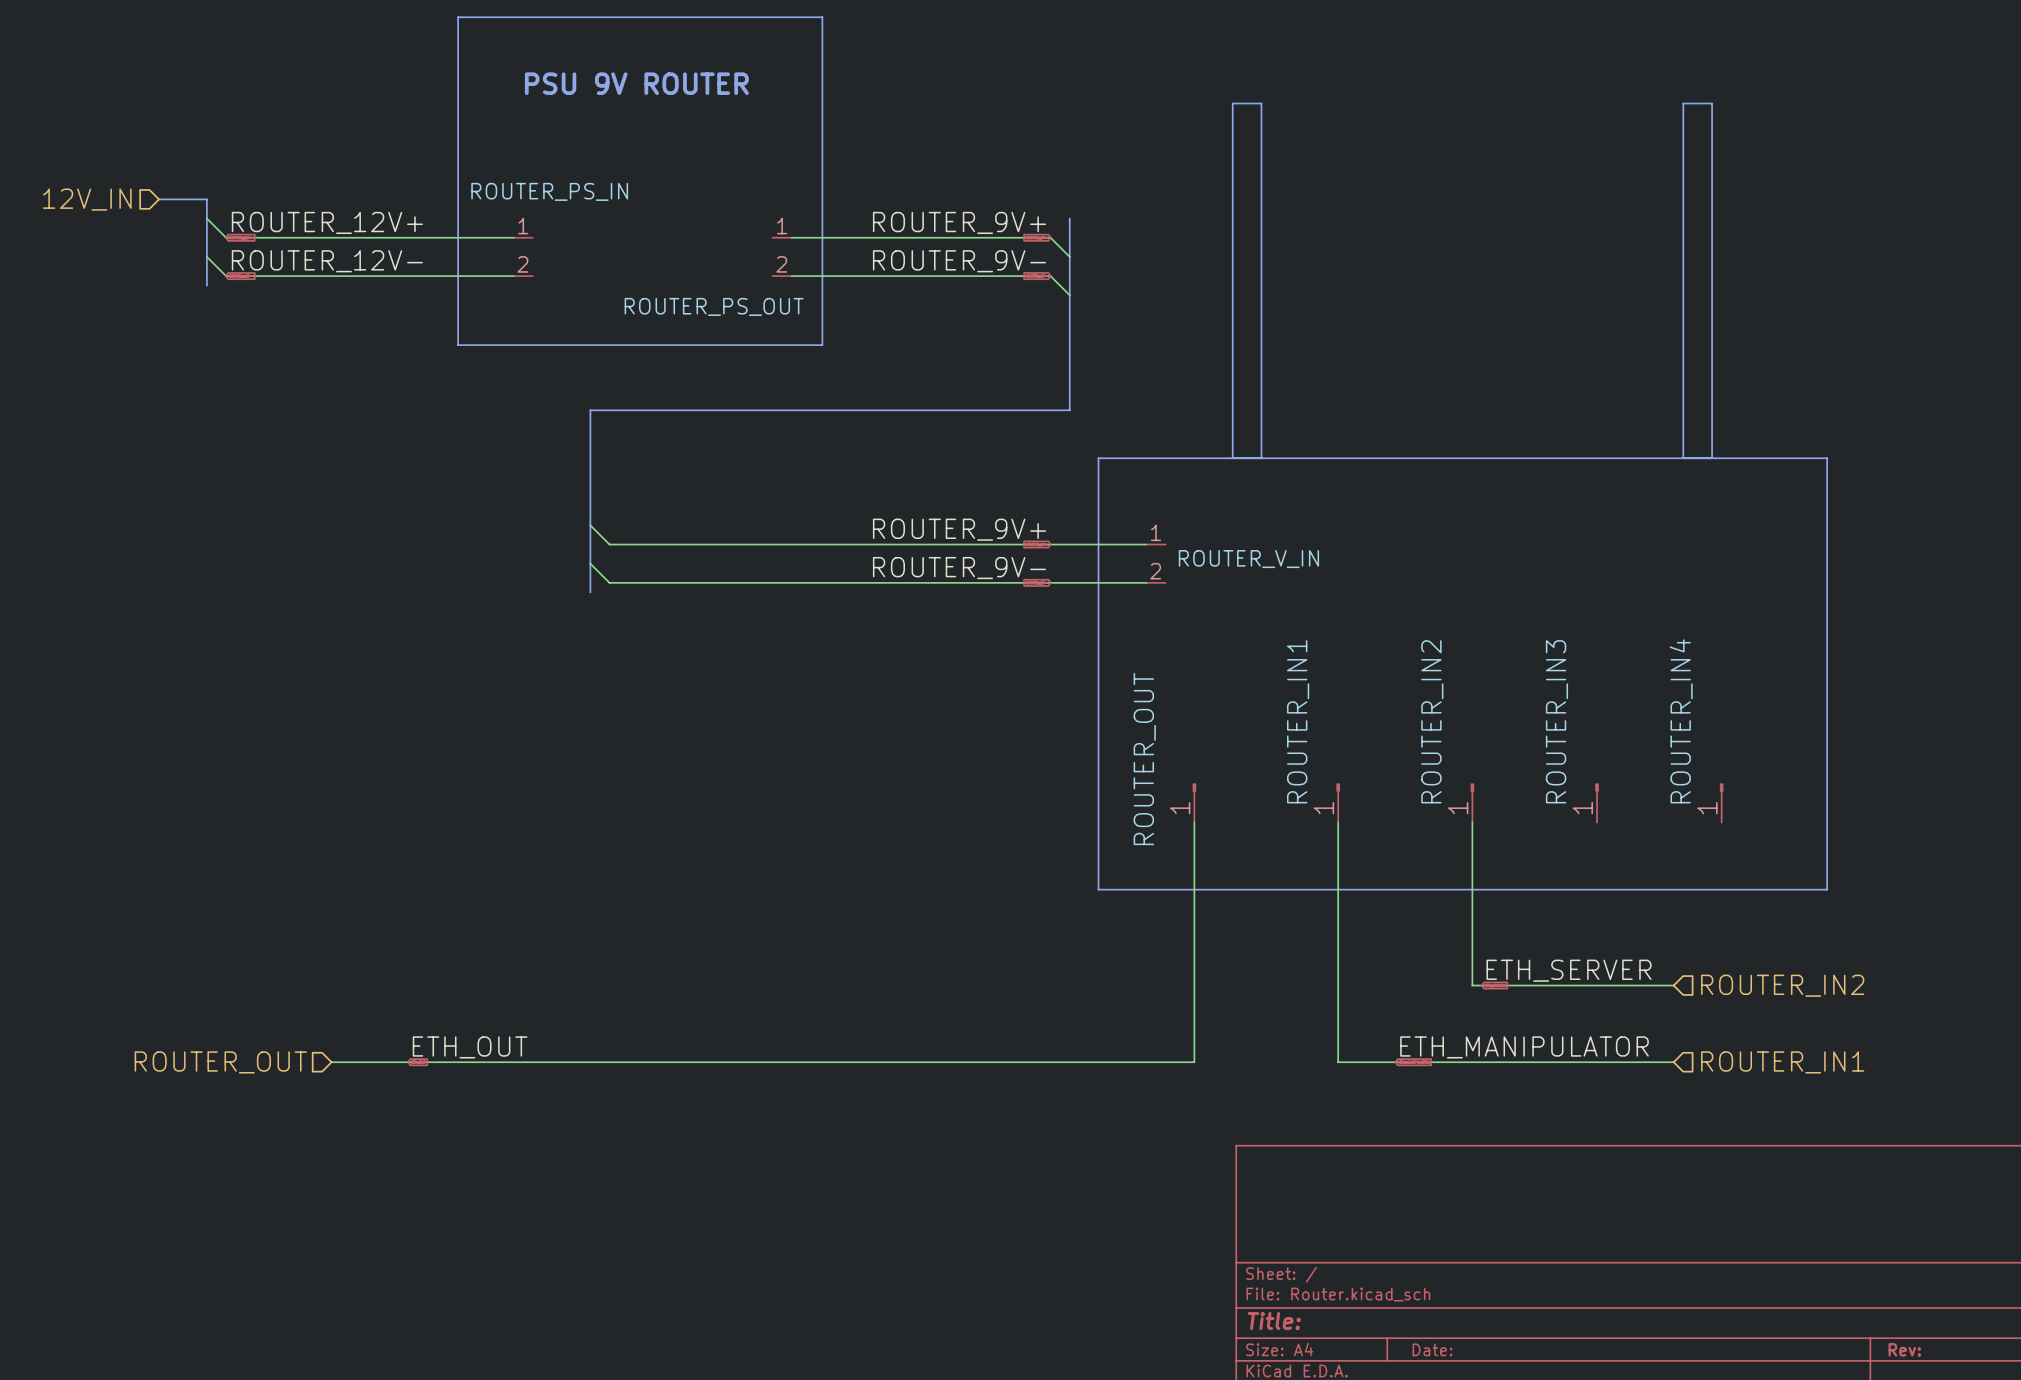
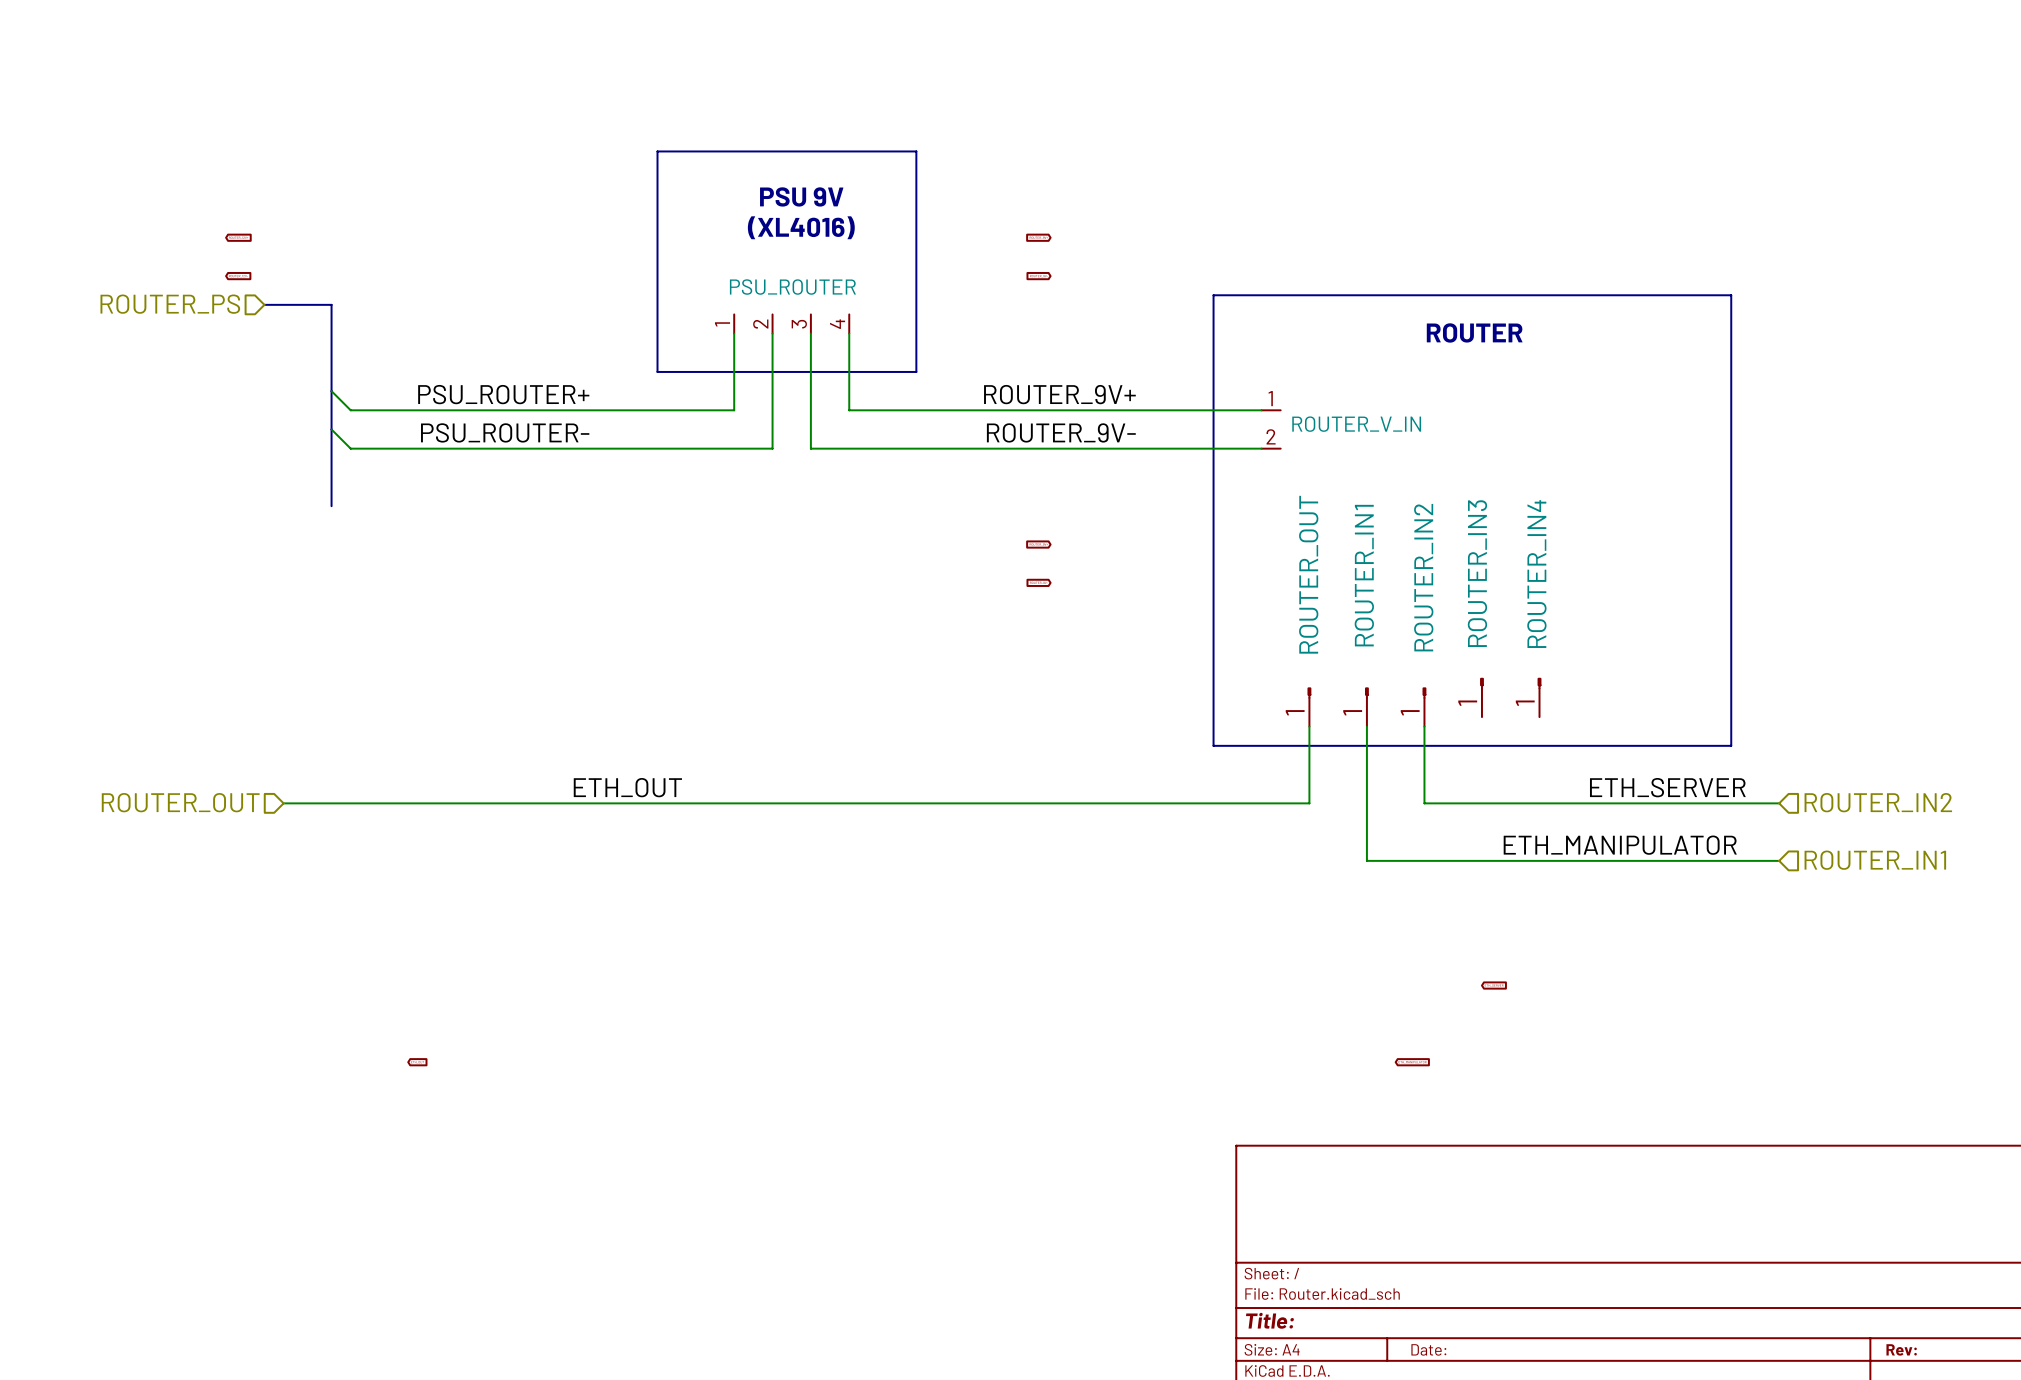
line: (458, 17) (822, 17) (822, 345) (458, 345) (458, 17) -> none
text: PSU 9V ROUTER (636, 83) -> none
line: none -> (657, 151) (916, 151) (916, 371) (657, 371) (657, 151)
text: none -> PSU 9V (801, 196)
hierarchical label: 12V_IN (87, 199) -> none
bus: (158, 199) (206, 199) (206, 285) -> none
wire: (206, 218) (226, 237) (513, 237) -> none
bus: (1069, 218) (1069, 410) (590, 410) (590, 592) -> none
label: ROUTER_12V+ (327, 222) -> none
label: ROUTER_9V+ (959, 222) -> none
text: none -> (XL4016) (801, 227)
wire: (791, 237) (1050, 237) (1069, 256) -> none
wire: (206, 256) (226, 276) (513, 276) -> none
ROUTER_PS_IN: (523, 256) -> none
ROUTER_PS_OUT: (782, 256) -> none
label: ROUTER_12V- (327, 261) -> none
label: ROUTER_9V- (959, 261) -> none
wire: (791, 276) (1050, 276) (1069, 295) -> none
line: none -> (1213, 295) (1731, 295) (1731, 745) (1213, 745) (1213, 295)
bus: none -> (264, 304) (331, 304) (331, 506)
hierarchical label: none -> ROUTER_PS (170, 304)
PSU_ROUTER: none -> (791, 324)
text: none -> ROUTER (1474, 332)
wire: none -> (734, 333) (734, 410) (350, 410) (331, 391)
wire: none -> (772, 333) (772, 448) (350, 448) (331, 429)
wire: none -> (810, 333) (810, 448) (1261, 448)
wire: none -> (849, 333) (849, 410) (1261, 410)
label: none -> PSU_ROUTER+ (503, 394)
label: none -> ROUTER_9V+ (1059, 394)
label: none -> PSU_ROUTER- (505, 432)
label: none -> ROUTER_9V- (1061, 432)
line: (1098, 458) (1827, 458) (1827, 889) (1098, 889) (1098, 458) -> none
line: (1232, 458) (1232, 103) (1261, 103) (1261, 458) -> none
line: (1683, 458) (1683, 103) (1712, 103) (1712, 458) -> none
wire: (590, 525) (609, 544) (1146, 544) -> none
label: ROUTER_9V+ (959, 529) -> none
wire: (590, 563) (609, 582) (1146, 582) -> none
ROUTER_V_IN position: (1156, 563) -> (1271, 429)
label: ROUTER_9V- (959, 568) -> none
ROUTER_IN1 name position: ROUTER_IN1 (1298, 721) -> ROUTER_IN1 (1364, 575)
ROUTER_IN2 name position: ROUTER_IN2 (1432, 721) -> ROUTER_IN2 (1423, 577)
ROUTER_IN3 name position: ROUTER_IN3 (1556, 721) -> ROUTER_IN3 (1477, 573)
ROUTER_IN4 name position: ROUTER_IN4 (1681, 721) -> ROUTER_IN4 (1536, 574)
wire: none -> (1309, 726) (1309, 803) (283, 803)
wire: none -> (1366, 726) (1366, 860) (1779, 860)
wire: none -> (1424, 726) (1424, 803) (1779, 803)
ROUTER_OUT name position: ROUTER_OUT (1144, 759) -> ROUTER_OUT (1308, 574)
label: none -> ETH_OUT (627, 787)
label: none -> ETH_SERVER (1667, 787)
hierarchical label: none -> ROUTER_OUT (180, 802)
ROUTER_OUT position: (1194, 803) -> (1309, 707)
ROUTER_IN1 position: (1338, 803) -> (1366, 707)
ROUTER_IN2 position: (1472, 803) -> (1424, 707)
ROUTER_IN3 position: (1597, 803) -> (1481, 697)
ROUTER_IN4 position: (1721, 803) -> (1539, 697)
hierarchical label: none -> ROUTER_IN2 (1878, 802)
wire: (1194, 822) (1194, 1062) (331, 1062) -> none
wire: (1338, 822) (1338, 1062) (1673, 1062) -> none
wire: (1472, 822) (1472, 985) (1673, 985) -> none
label: none -> ETH_MANIPULATOR (1620, 845)
hierarchical label: none -> ROUTER_IN1 (1875, 860)
label: ETH_SERVER (1569, 970) -> none
hierarchical label: ROUTER_IN2 (1782, 985) -> none
label: ETH_OUT (470, 1047) -> none
label: ETH_MANIPULATOR (1524, 1047) -> none
hierarchical label: ROUTER_OUT (220, 1062) -> none
hierarchical label: ROUTER_IN1 (1782, 1062) -> none

